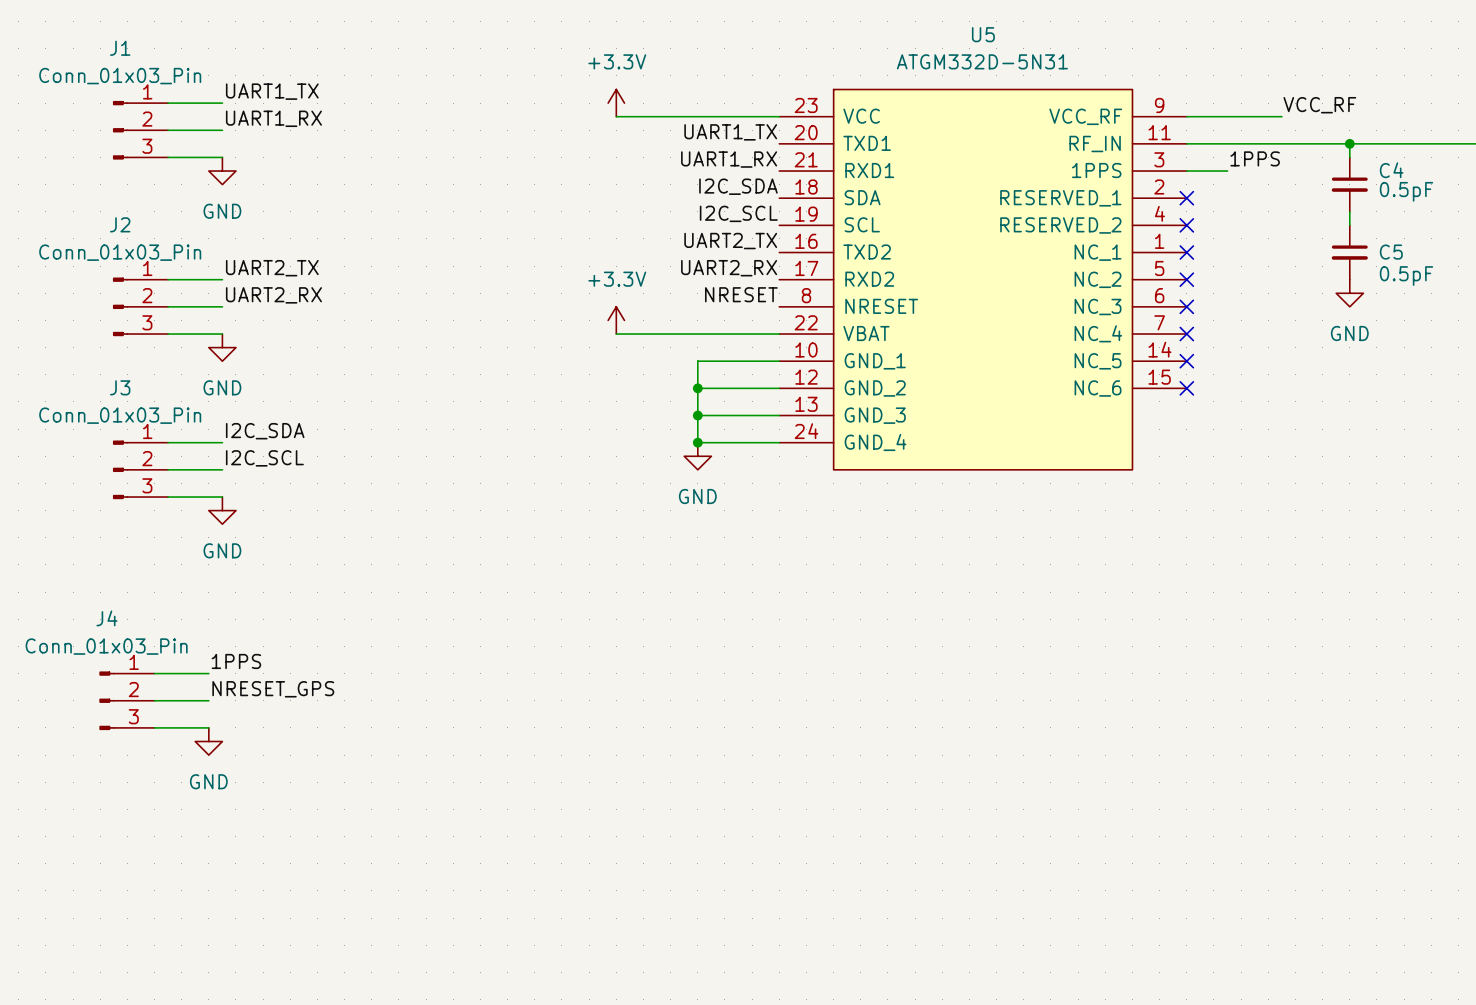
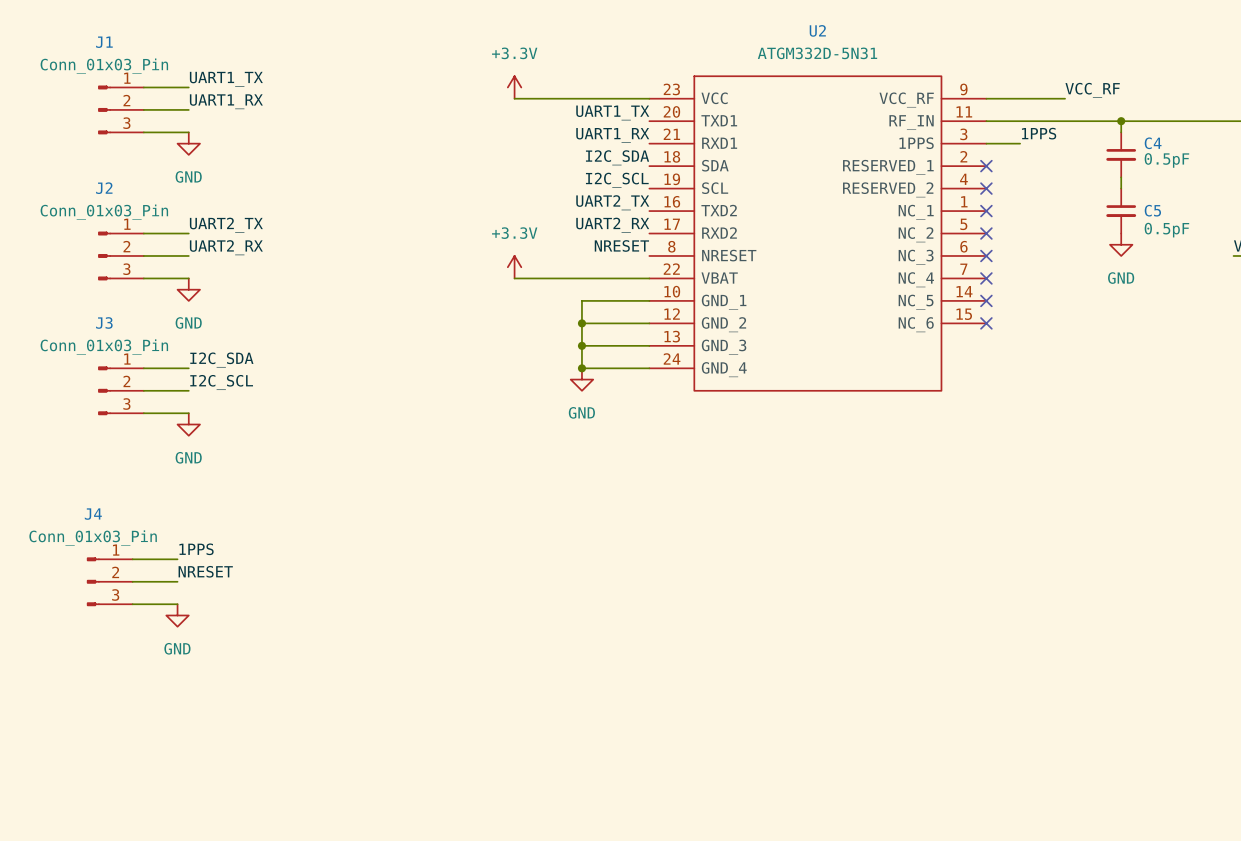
U5: ATGM332D-5N31 (983, 279) -> none
U2: none -> ATGM332D-5N31 (817, 233)
label: NRESET_GPS (273, 689) -> NRESET (205, 571)

